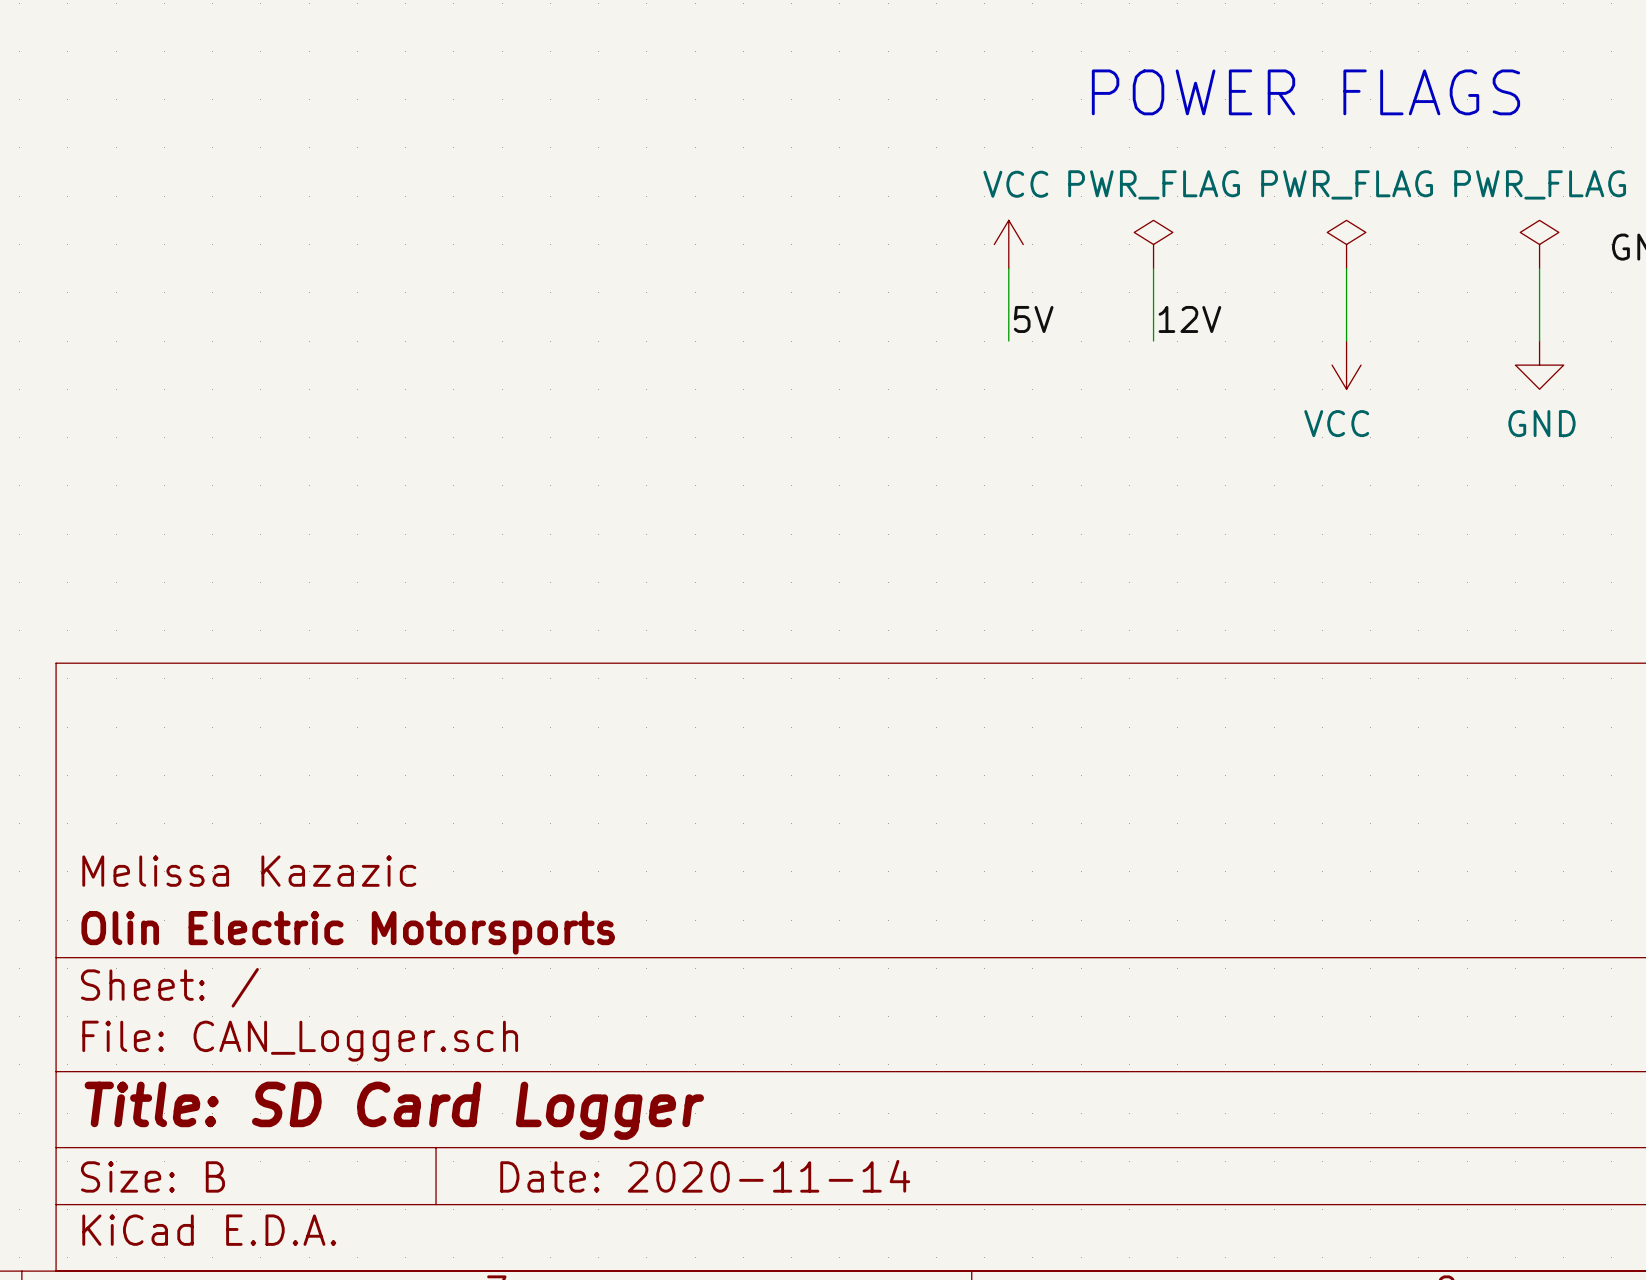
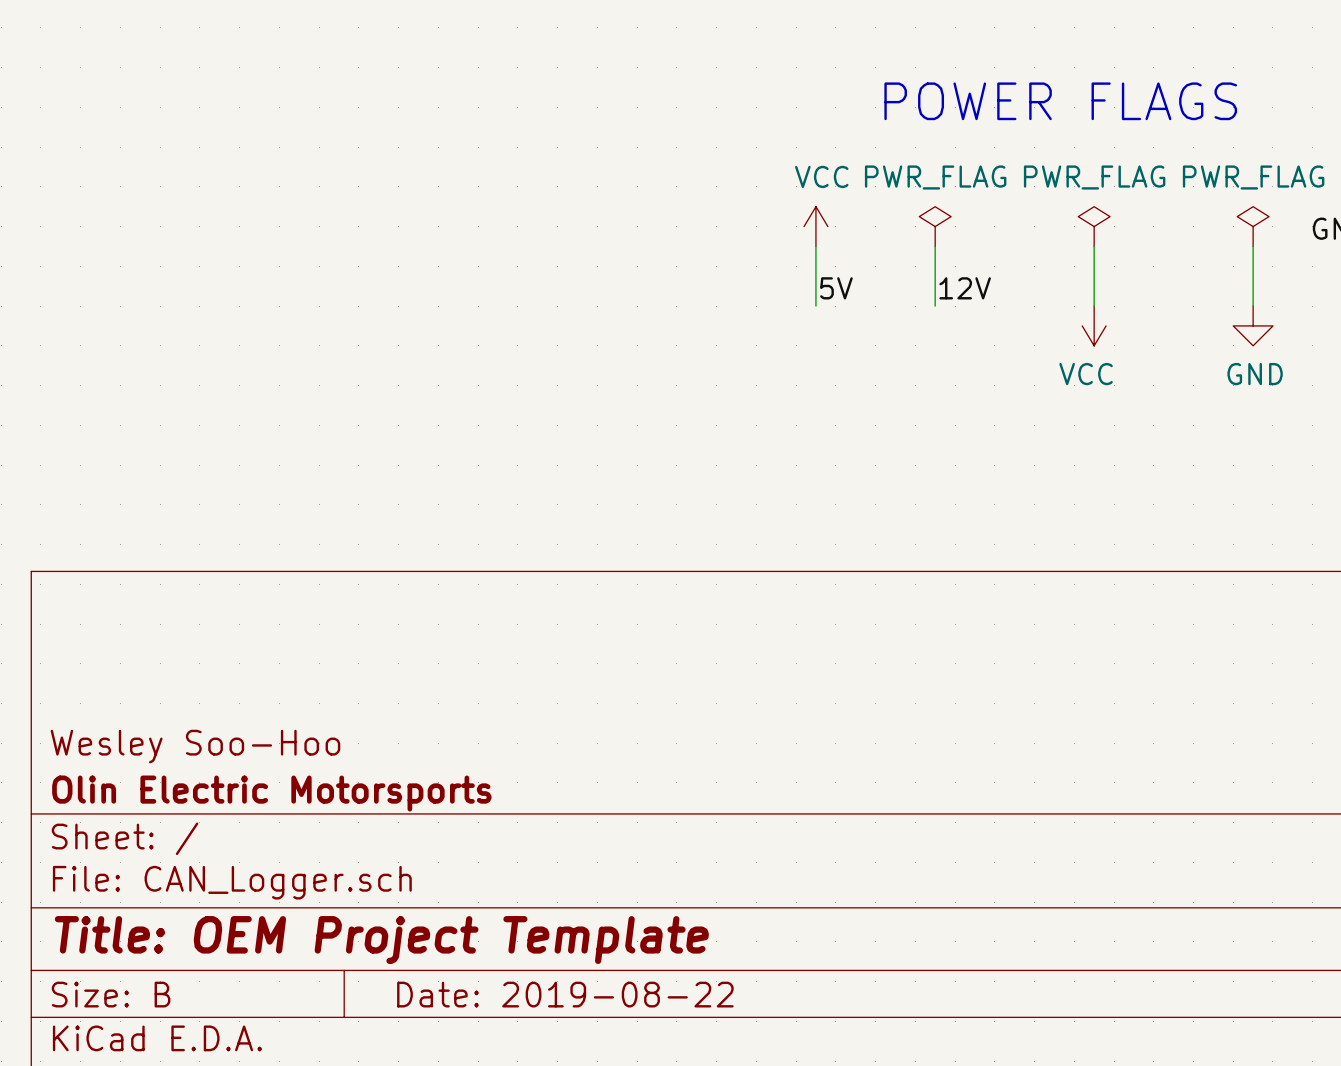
title block: Melissa Kazazic (249, 871) -> Wesley Soo-Hoo (195, 746)
title block: Title: SD Card Logger (394, 1110) -> Title: OEM Project Template (381, 940)
title block: Date: 2020-11-14 (705, 1176) -> Date: 2019-08-22 (565, 994)

